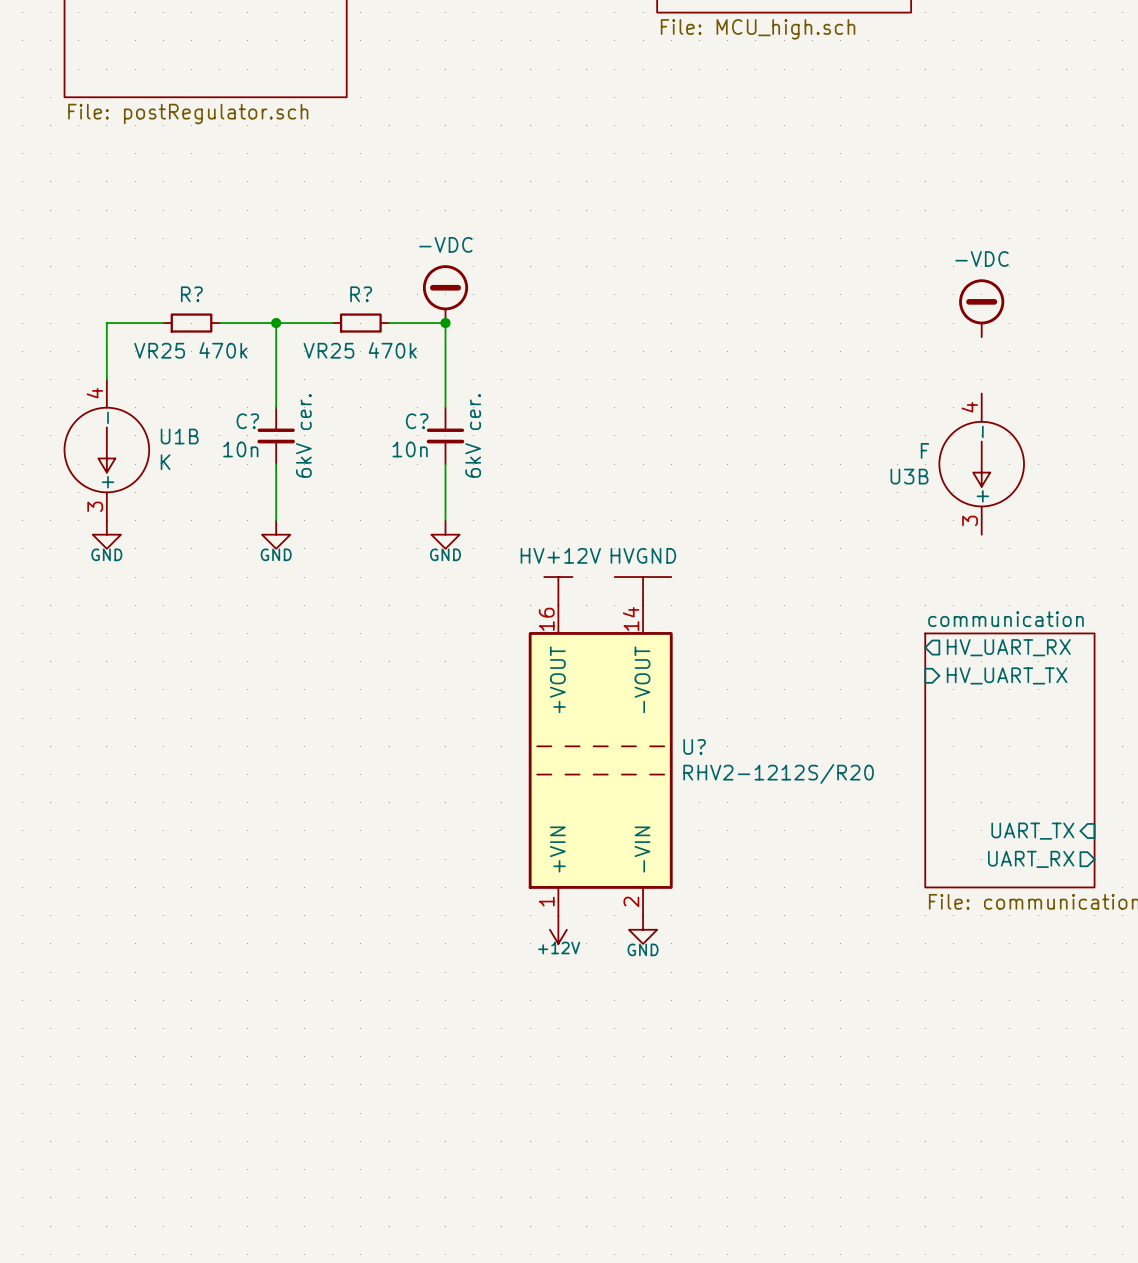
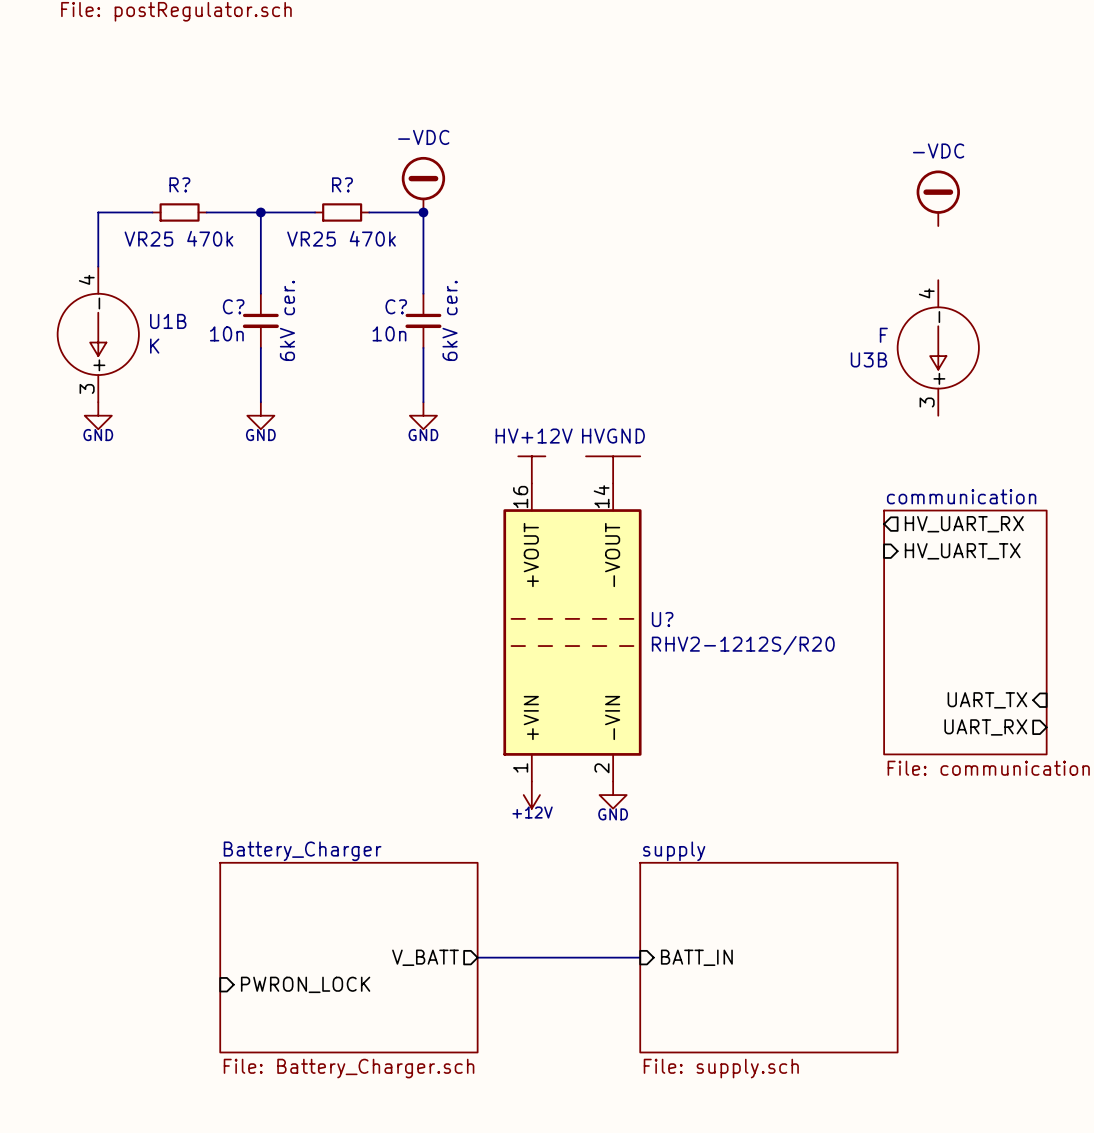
sheet Battery_Charger: none -> File: Battery_Charger.sch (348, 957)
sheet pin: none -> V_BATT (425, 957)
wire: none -> (477, 957) (640, 957)
sheet pin: none -> BATT_IN (696, 957)
sheet supply: none -> File: supply.sch (768, 957)
sheet pin: none -> PWRON_LOCK (305, 984)

